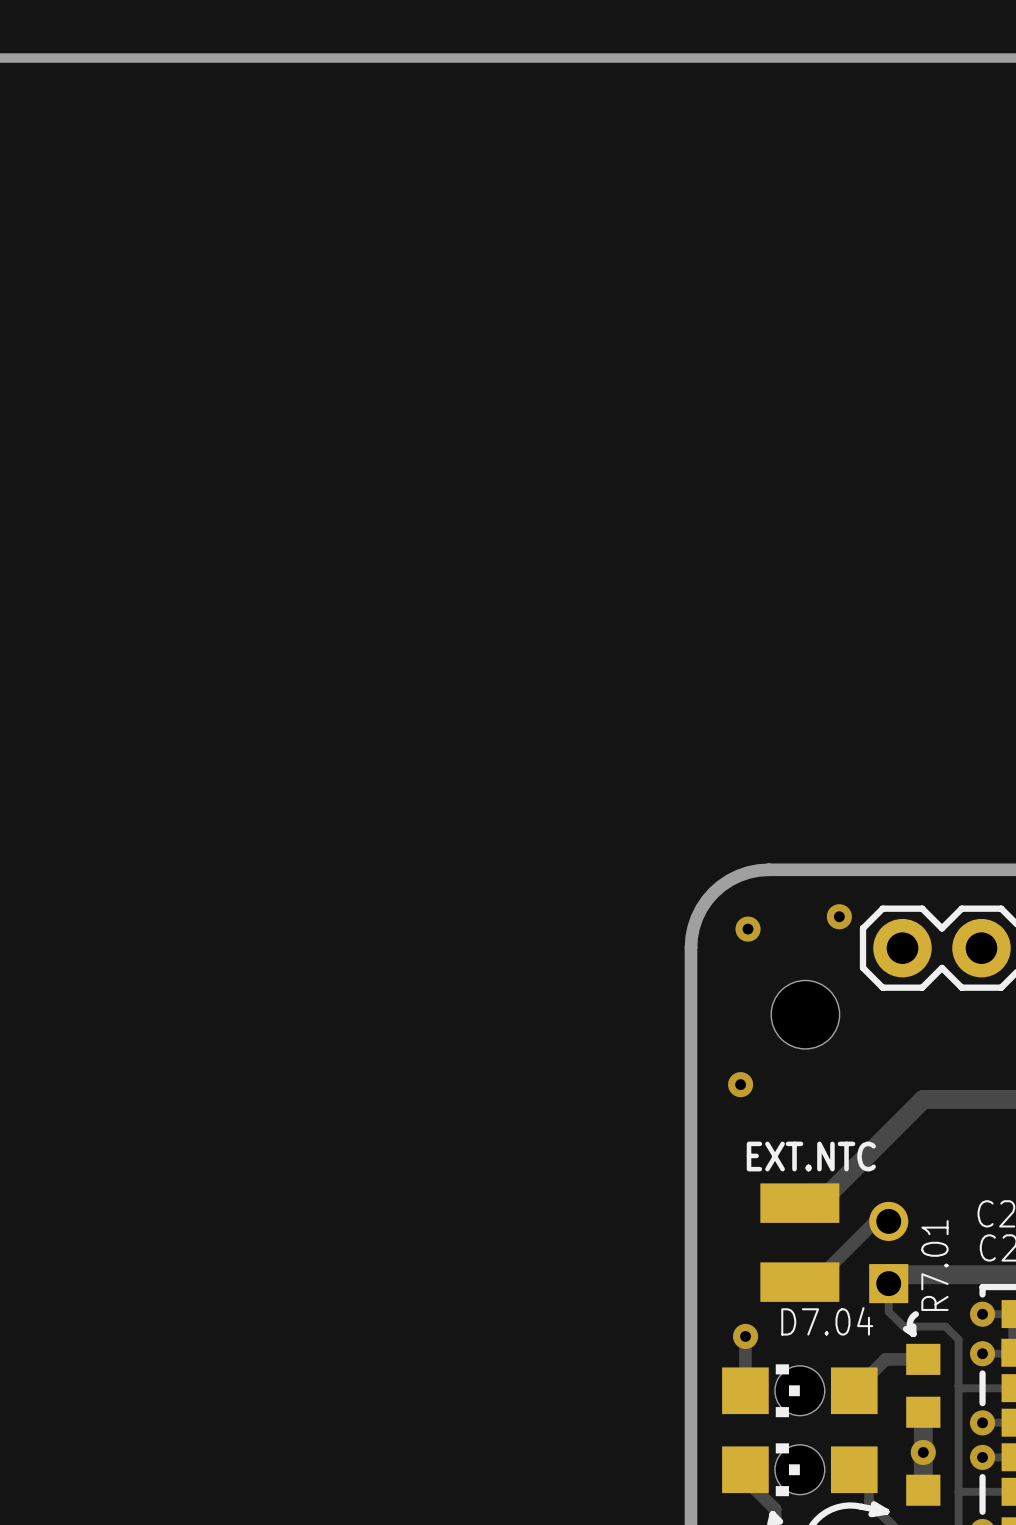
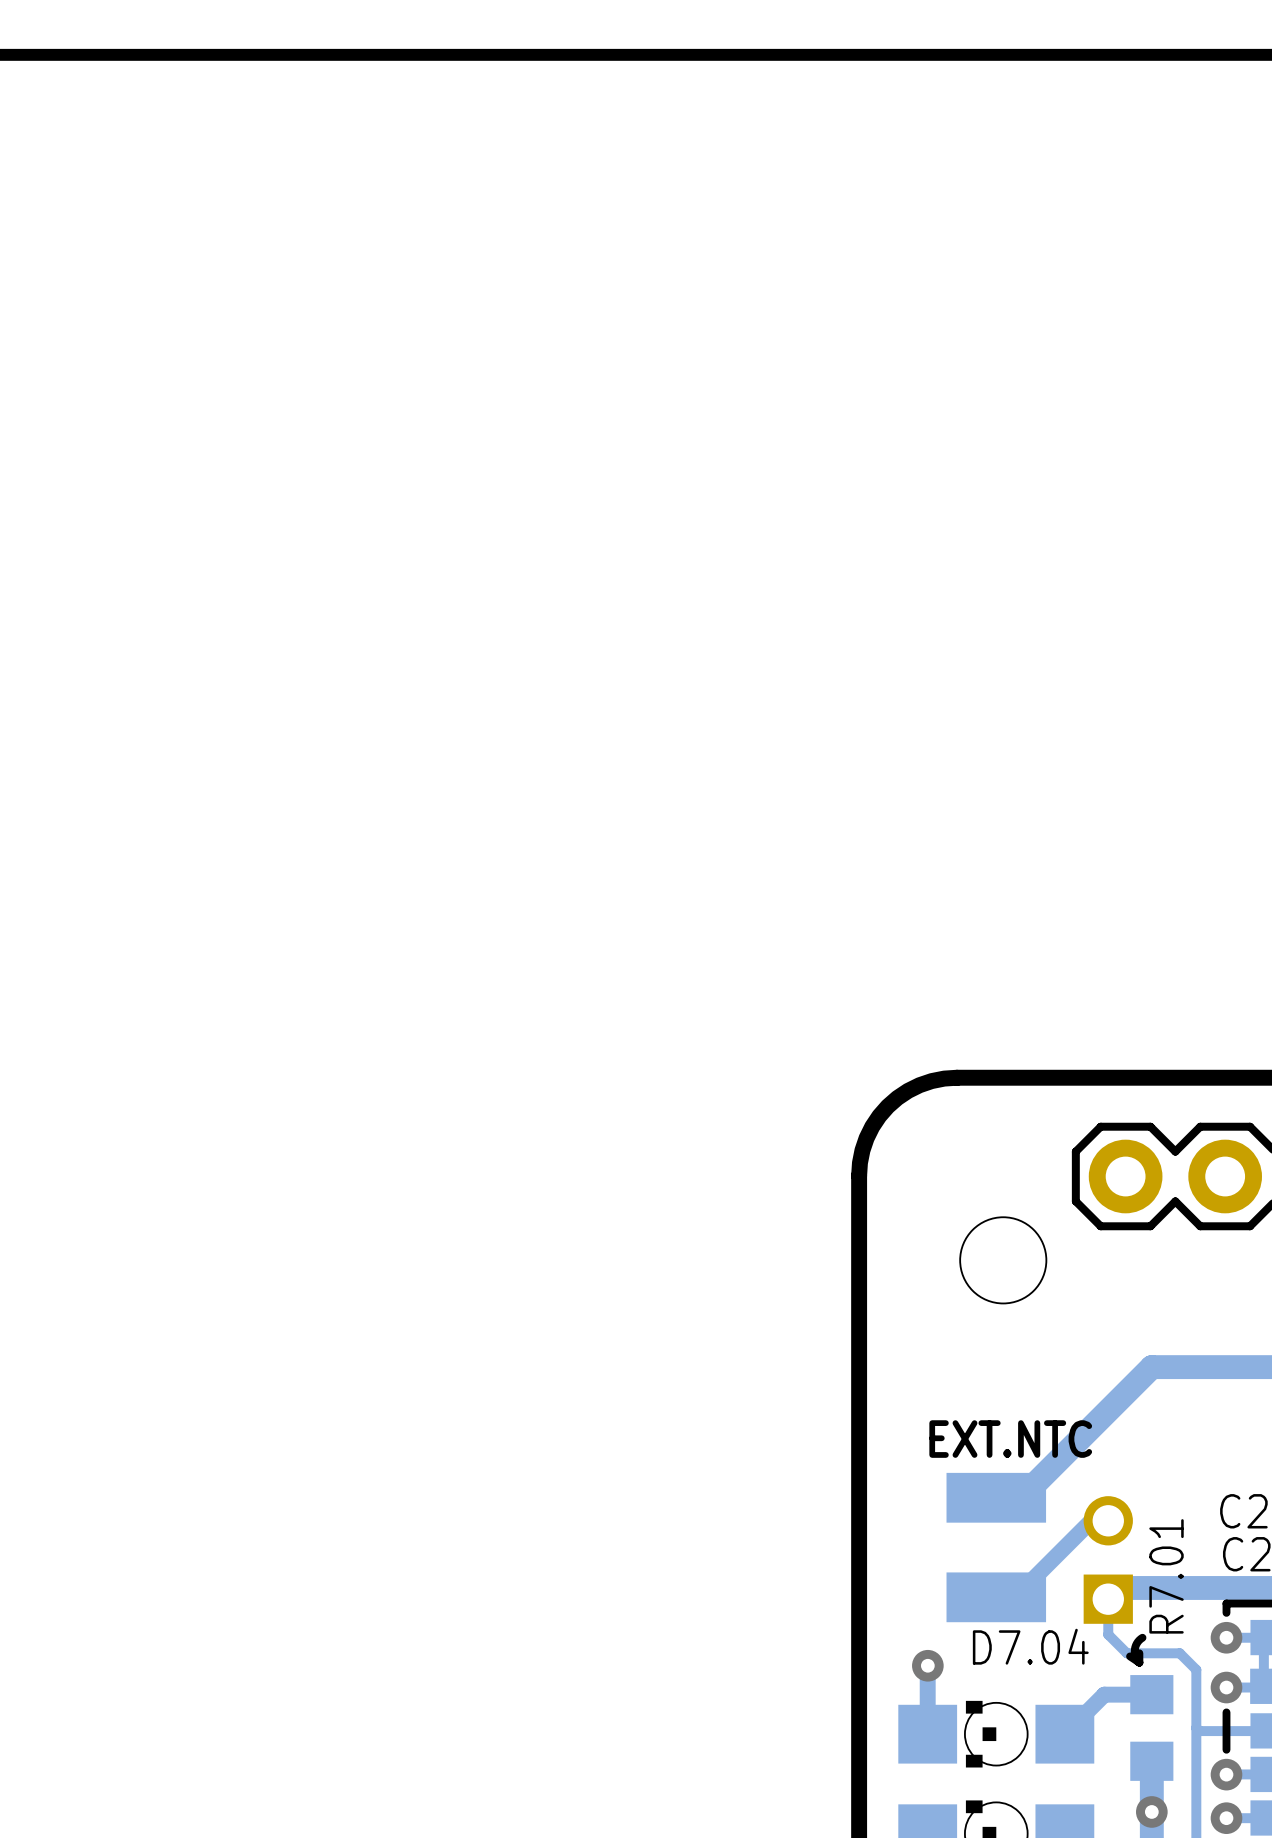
via: (839, 916) -> none
via: (748, 929) -> none
via: (740, 1084) -> none

